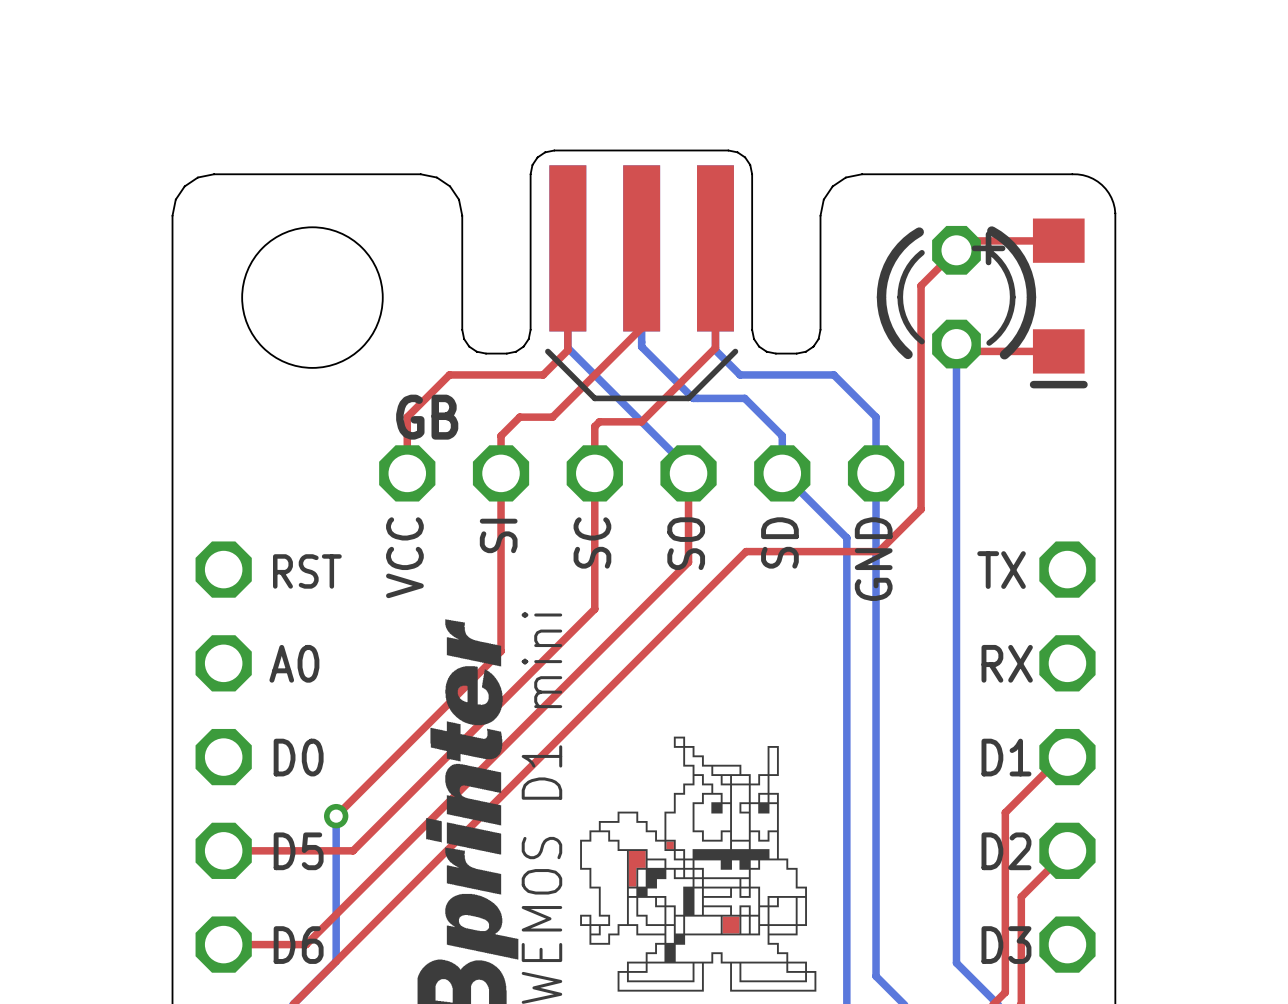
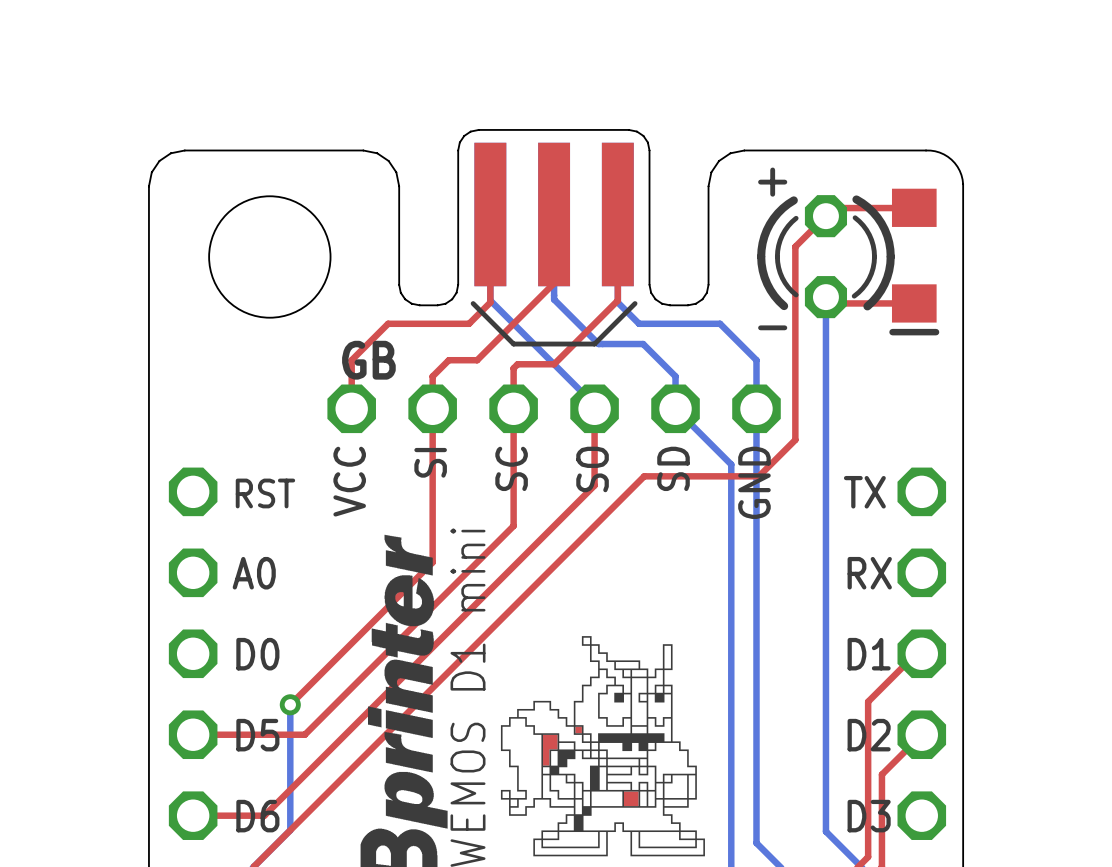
line: (988, 234) (988, 262) -> (772, 169) (772, 194)
line: (974, 248) (1002, 248) -> (760, 182) (784, 182)
line: none -> (760, 327) (784, 327)

